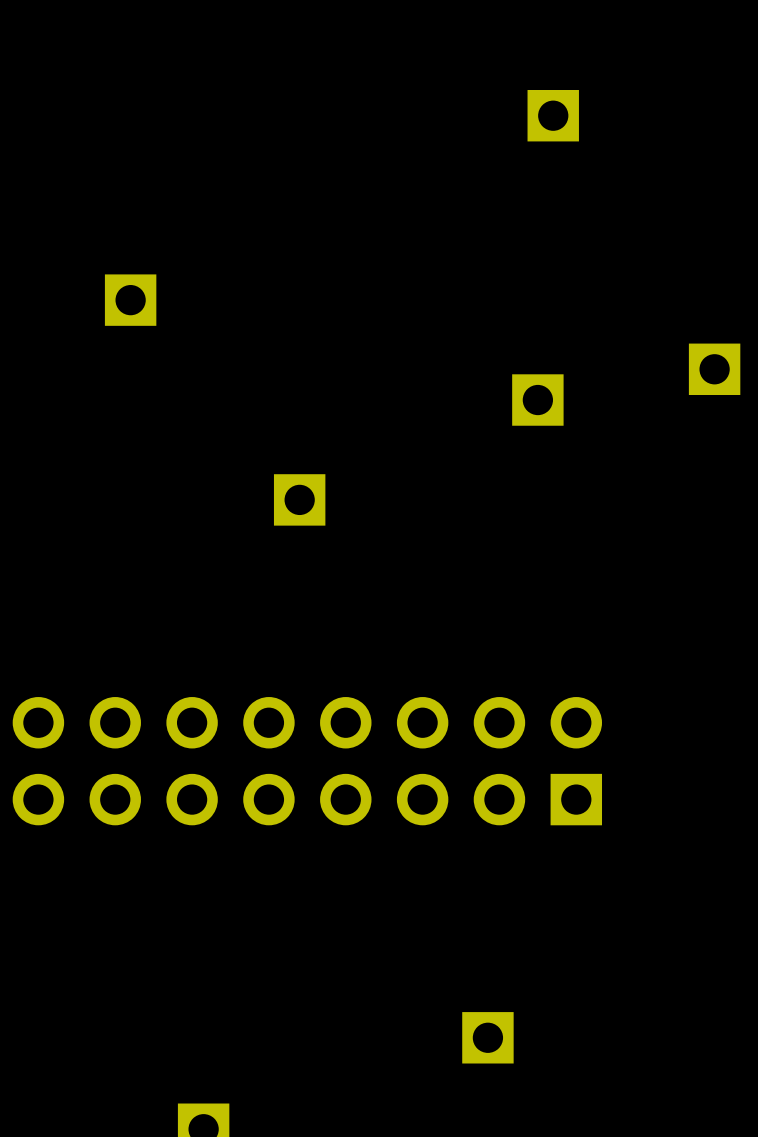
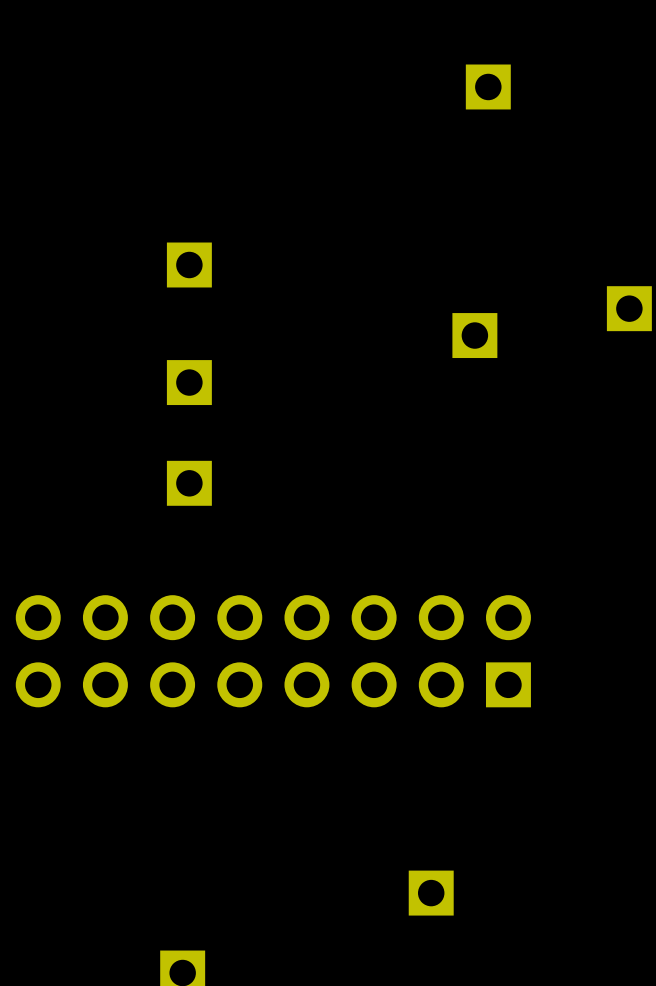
part position: (130, 300) -> (189, 265)
part: none -> (189, 382)
part: (299, 499) -> none
part: none -> (189, 483)

